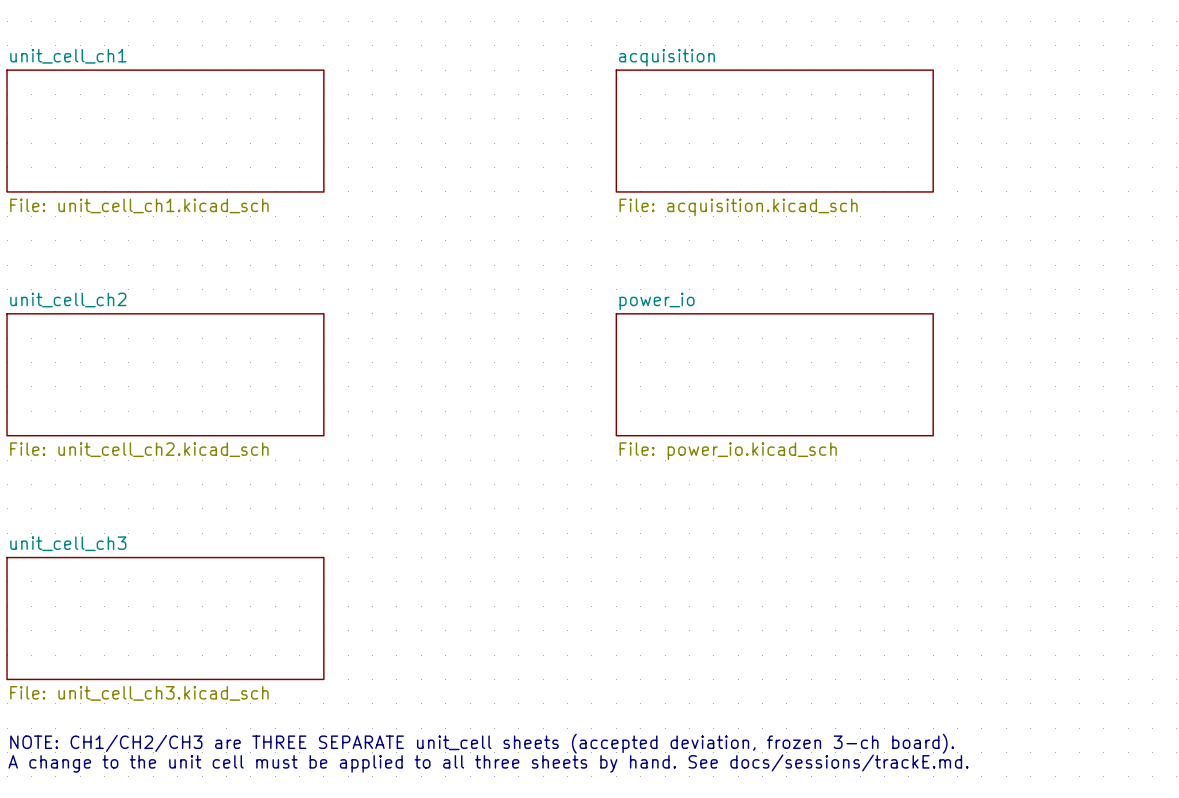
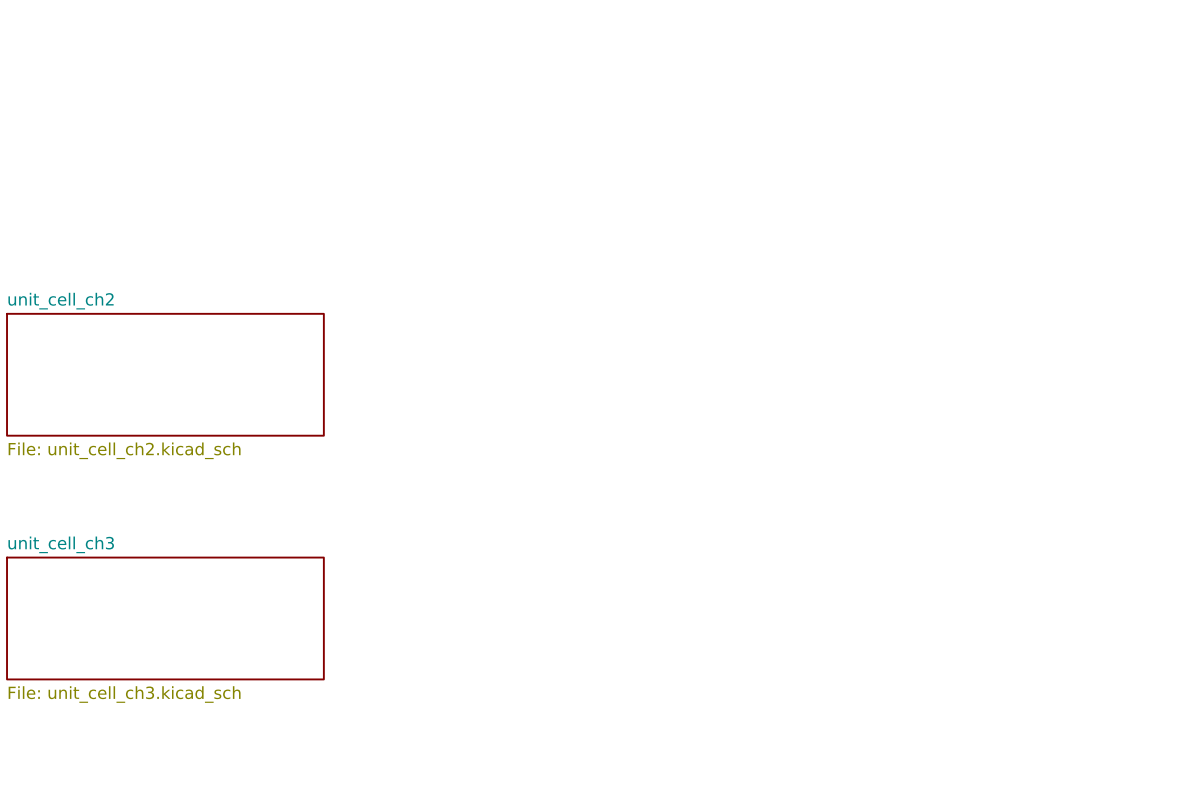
sheet unit_cell_ch1: File: unit_cell_ch1.kicad_sch (165, 131) -> none
sheet acquisition: File: acquisition.kicad_sch (774, 131) -> none
sheet power_io: File: power_io.kicad_sch (774, 374) -> none
text: NOTE: CH1/CH2/CH3 are THREE SEPARATE unit_cell sheets (accepted deviation, frozen 3-ch board). (482, 743) -> none
text: A change to the unit cell must be applied to all three sheets by hand. See docs/sessions/trackE.md. (488, 763) -> none

